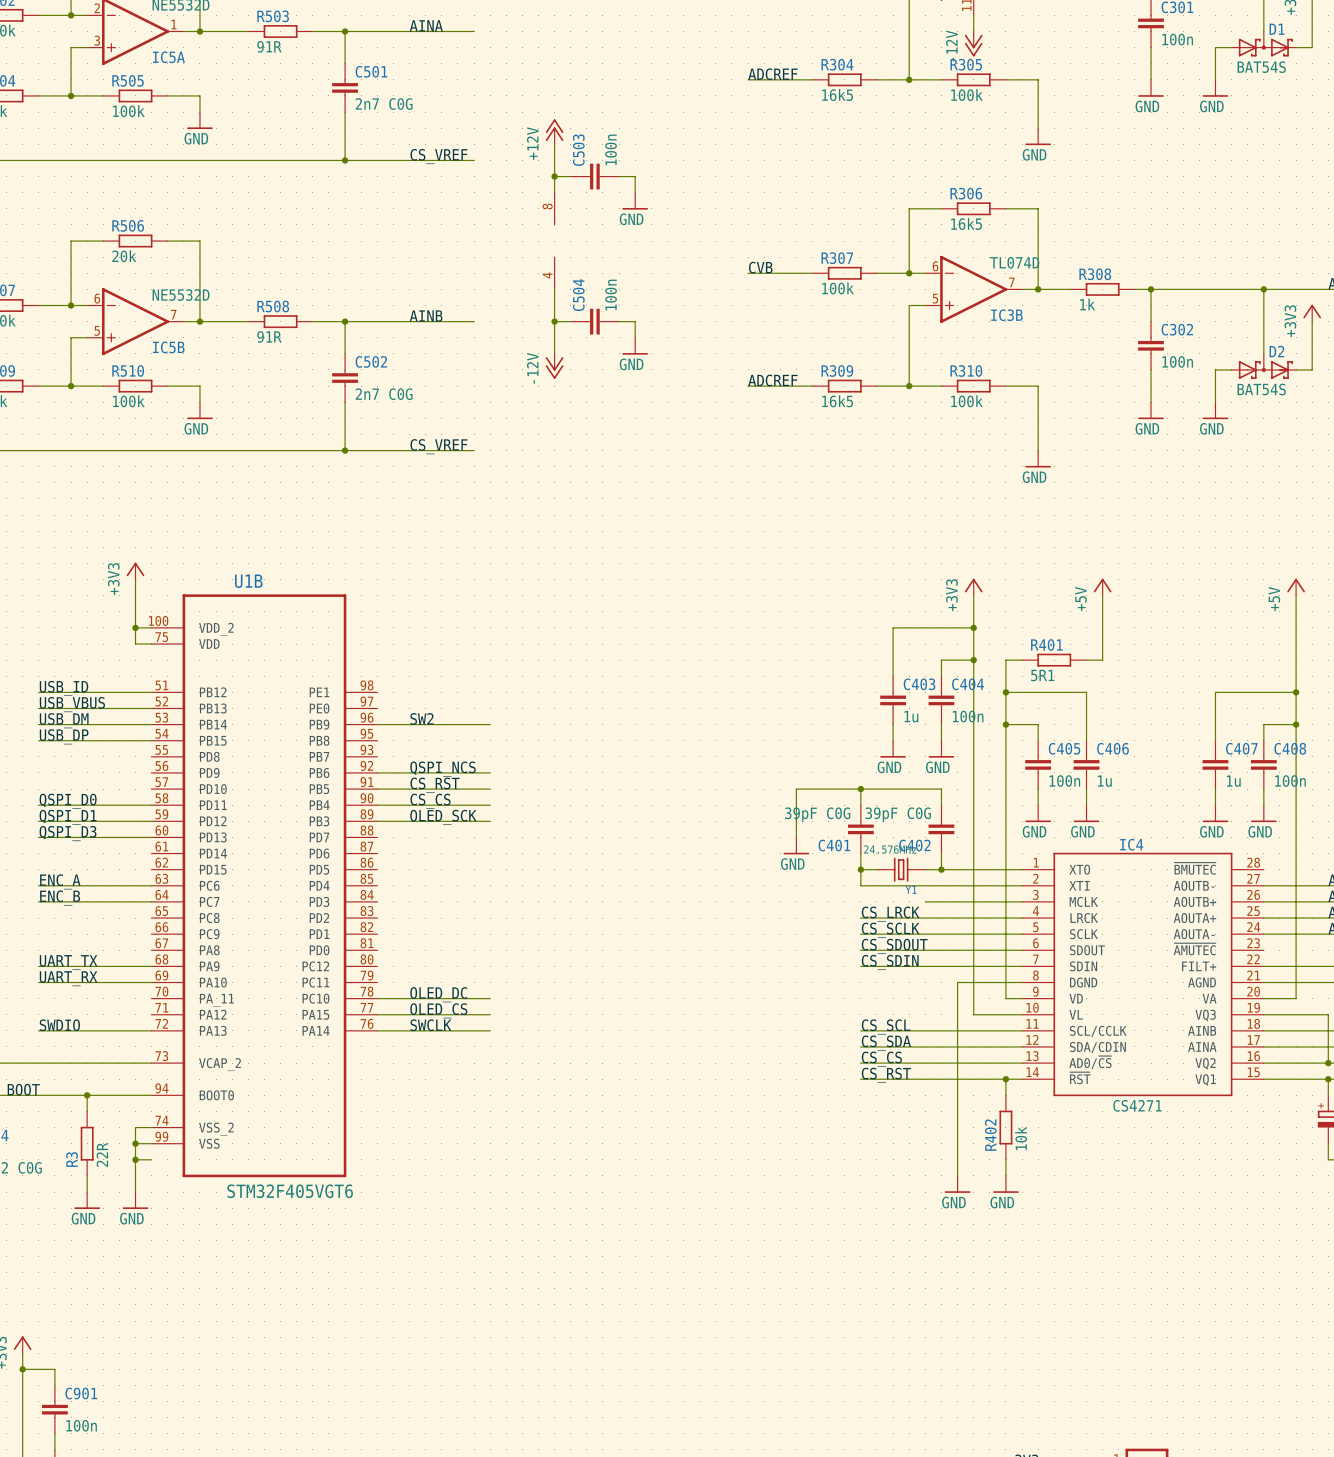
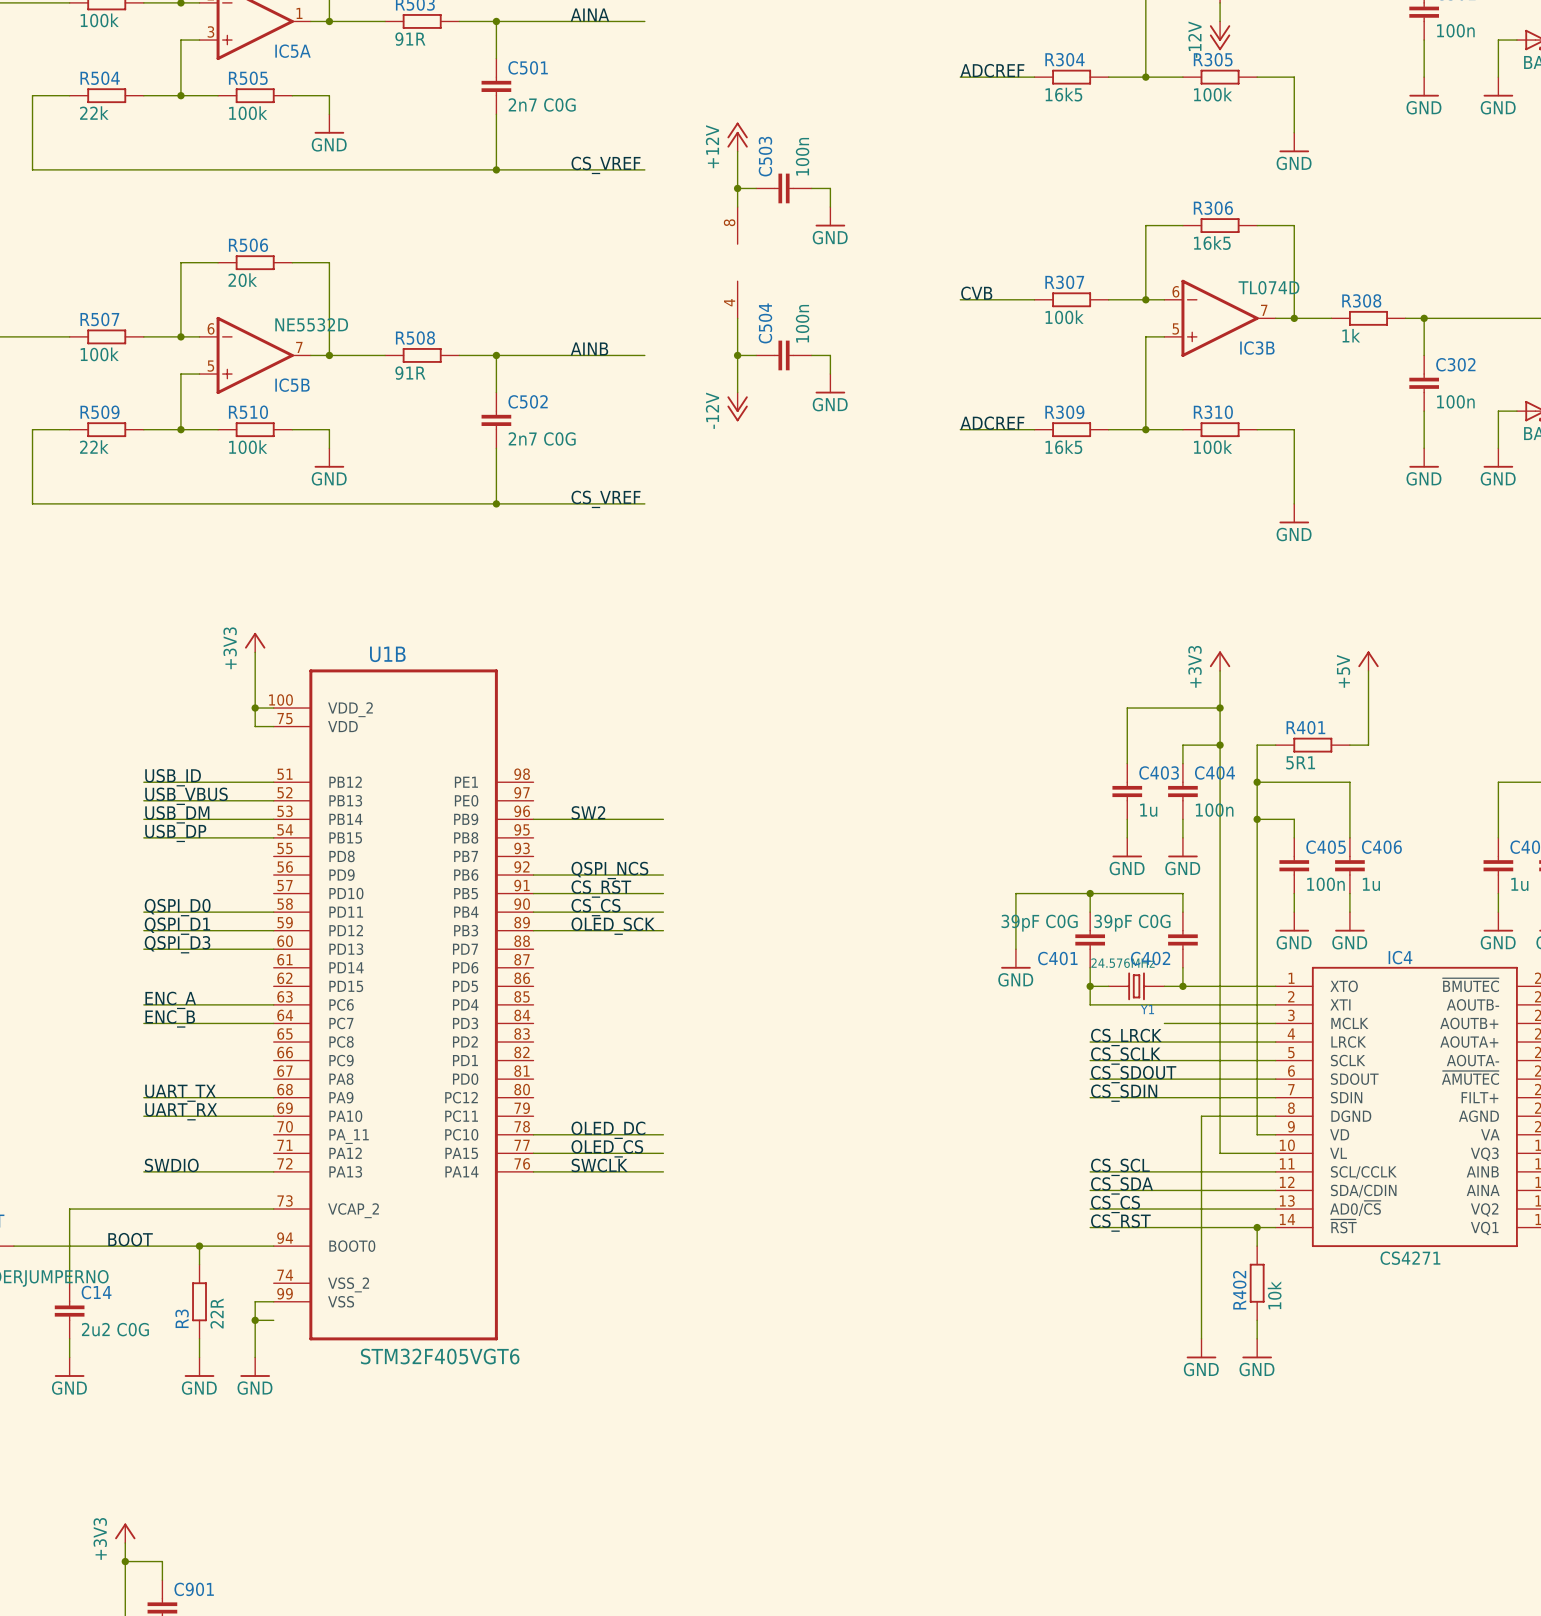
wire: (151, 1127) (135, 1127) (135, 1143) -> none
junction: (135, 1143) -> none

